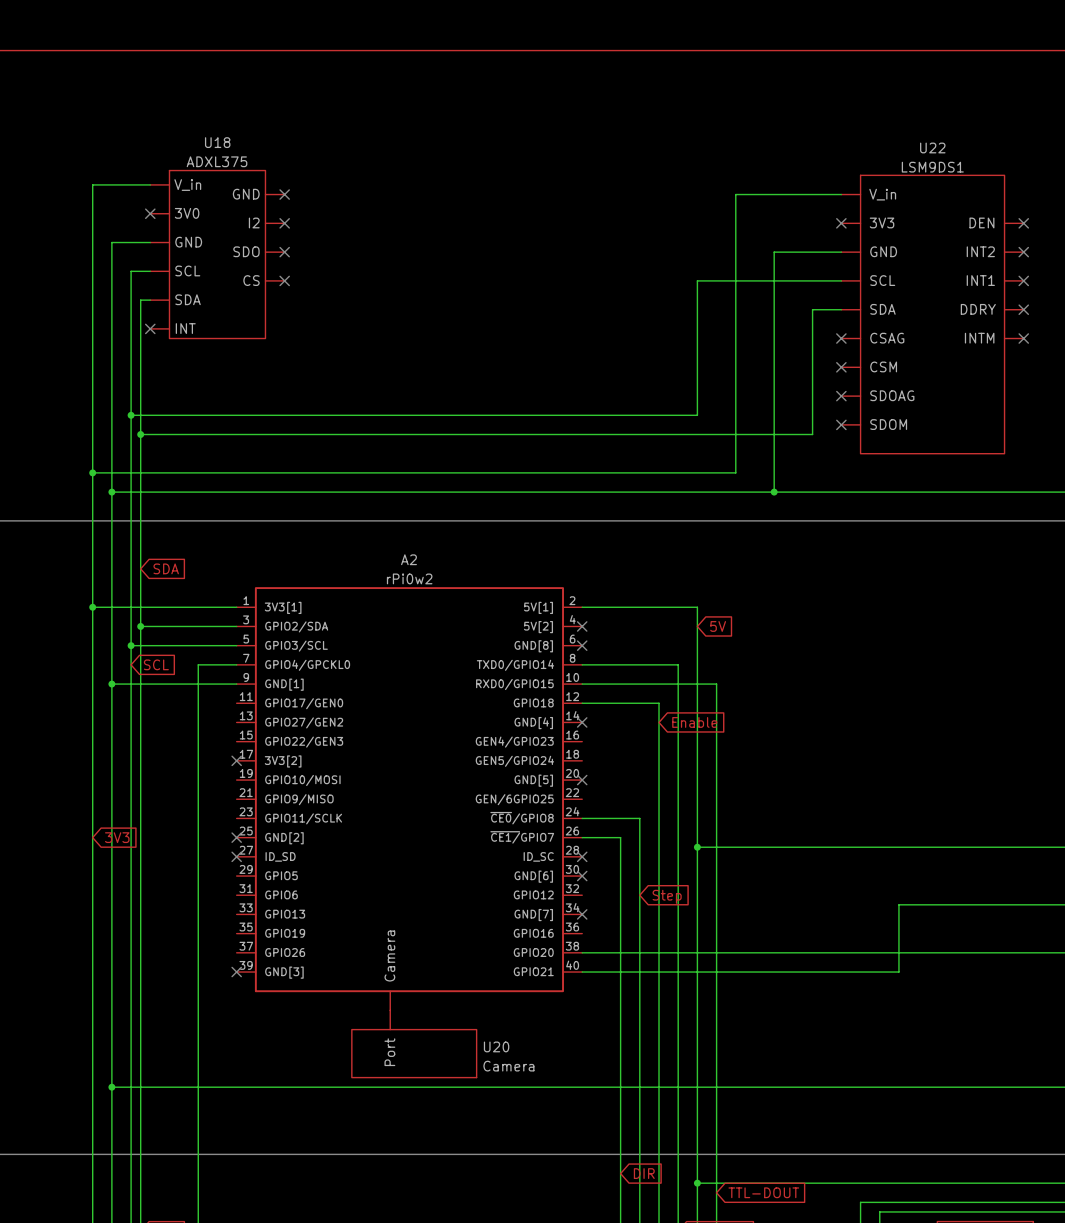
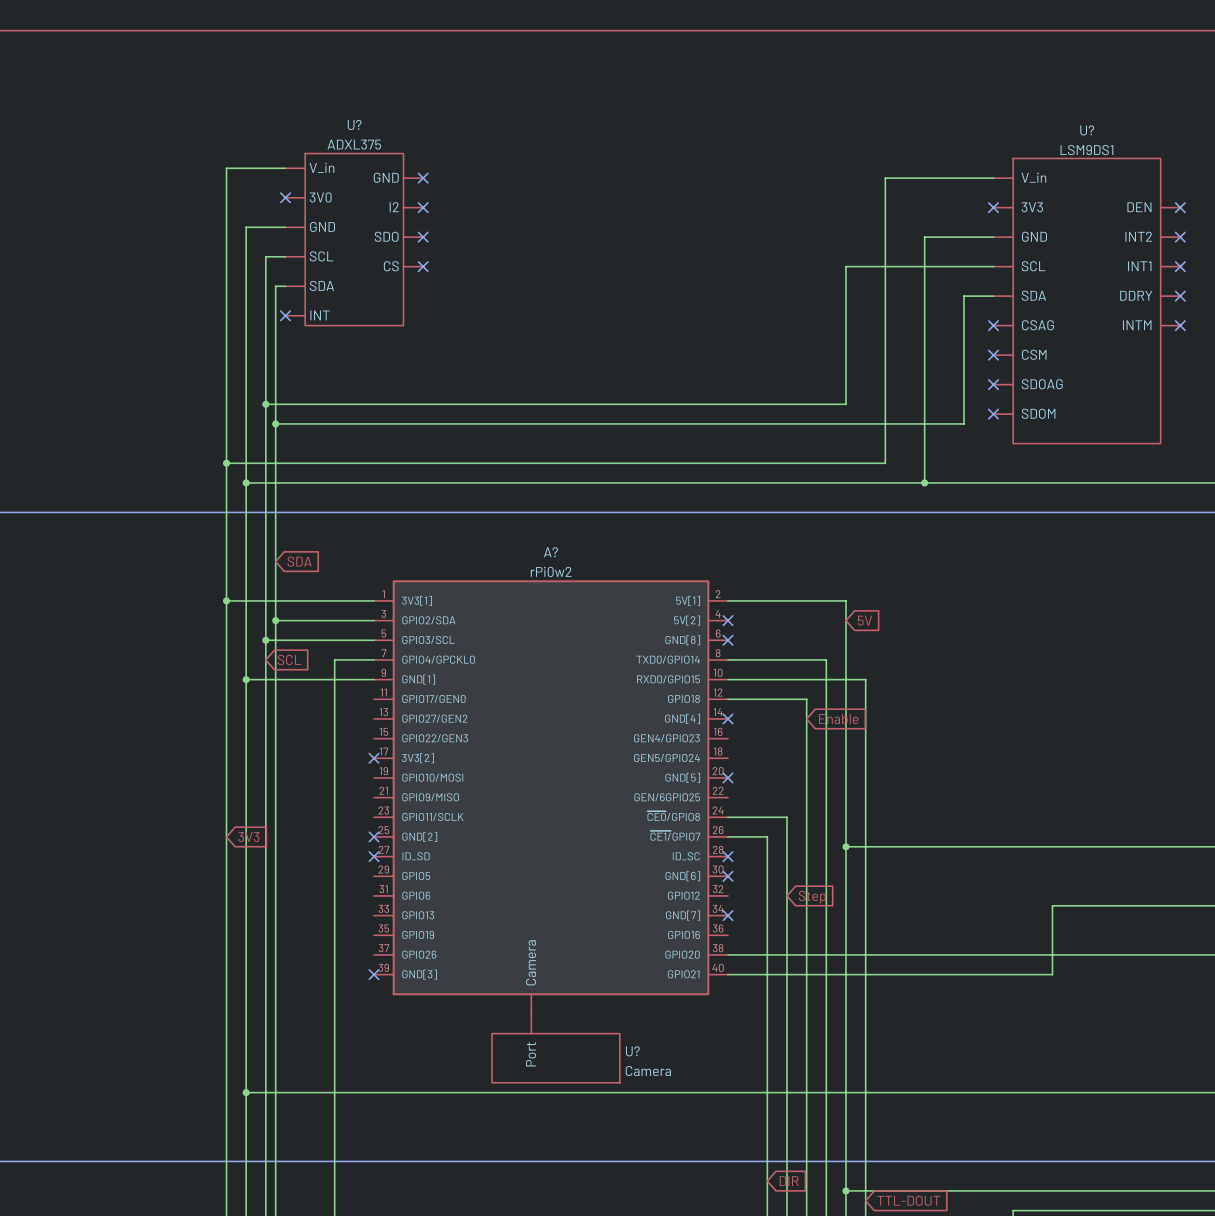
U18 name: U18 (217, 142) -> U? (354, 124)
U22 name: U22 (932, 147) -> U? (1087, 130)
A2 name: A2 (408, 559) -> A? (550, 552)
U20 name: U20 (496, 1046) -> U? (632, 1051)

